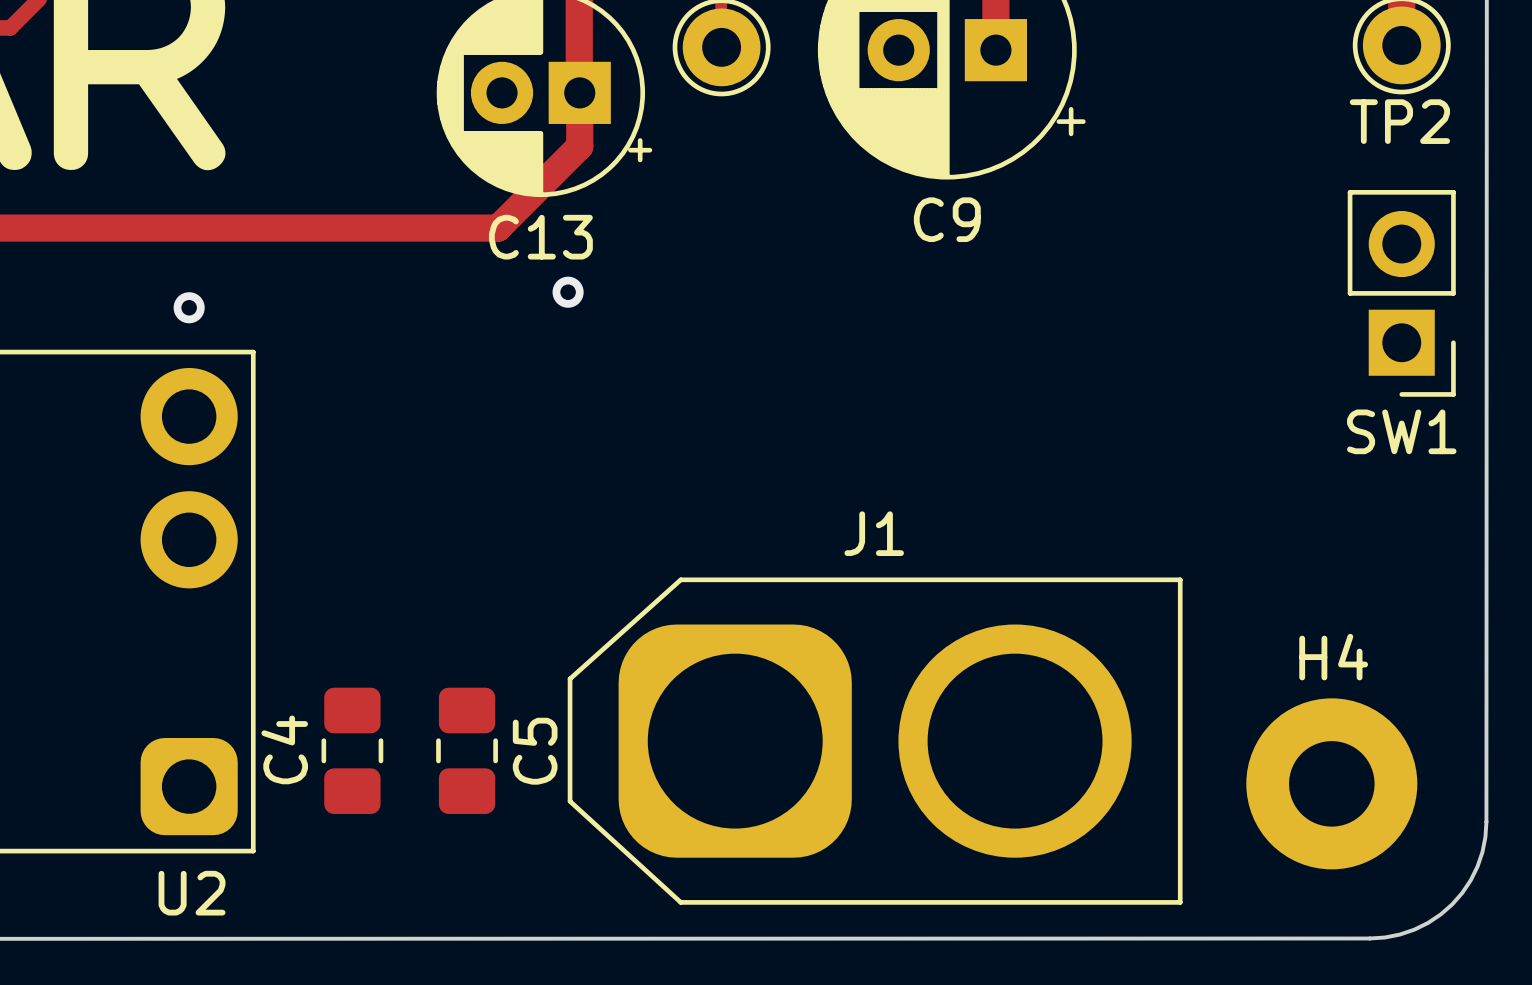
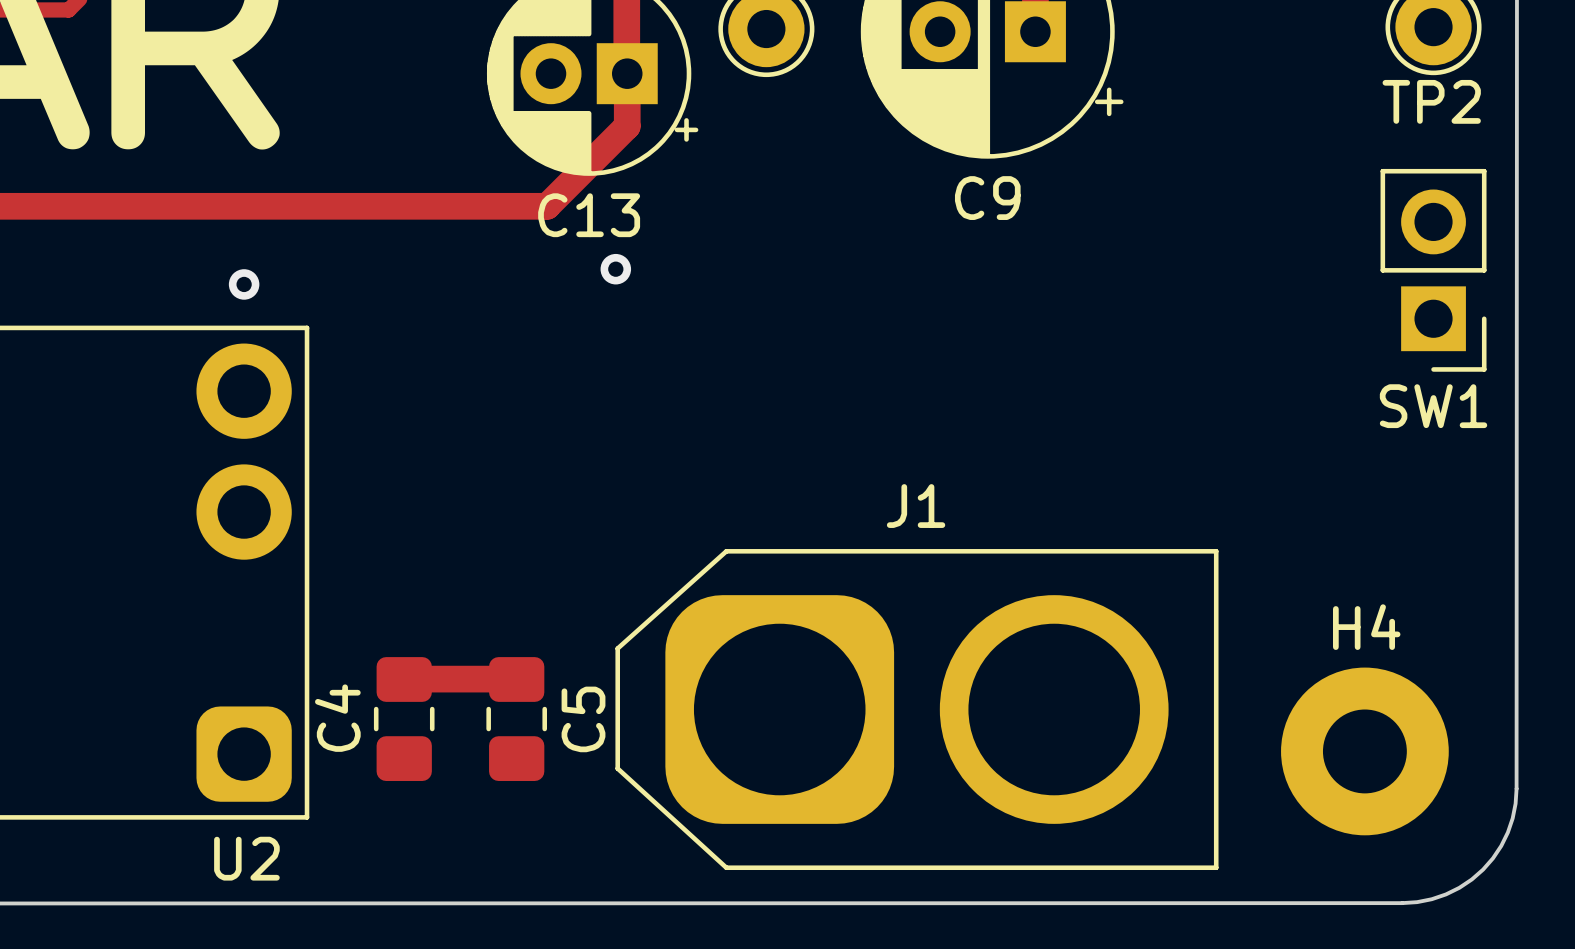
track: none -> (404, 679) (516, 679)

